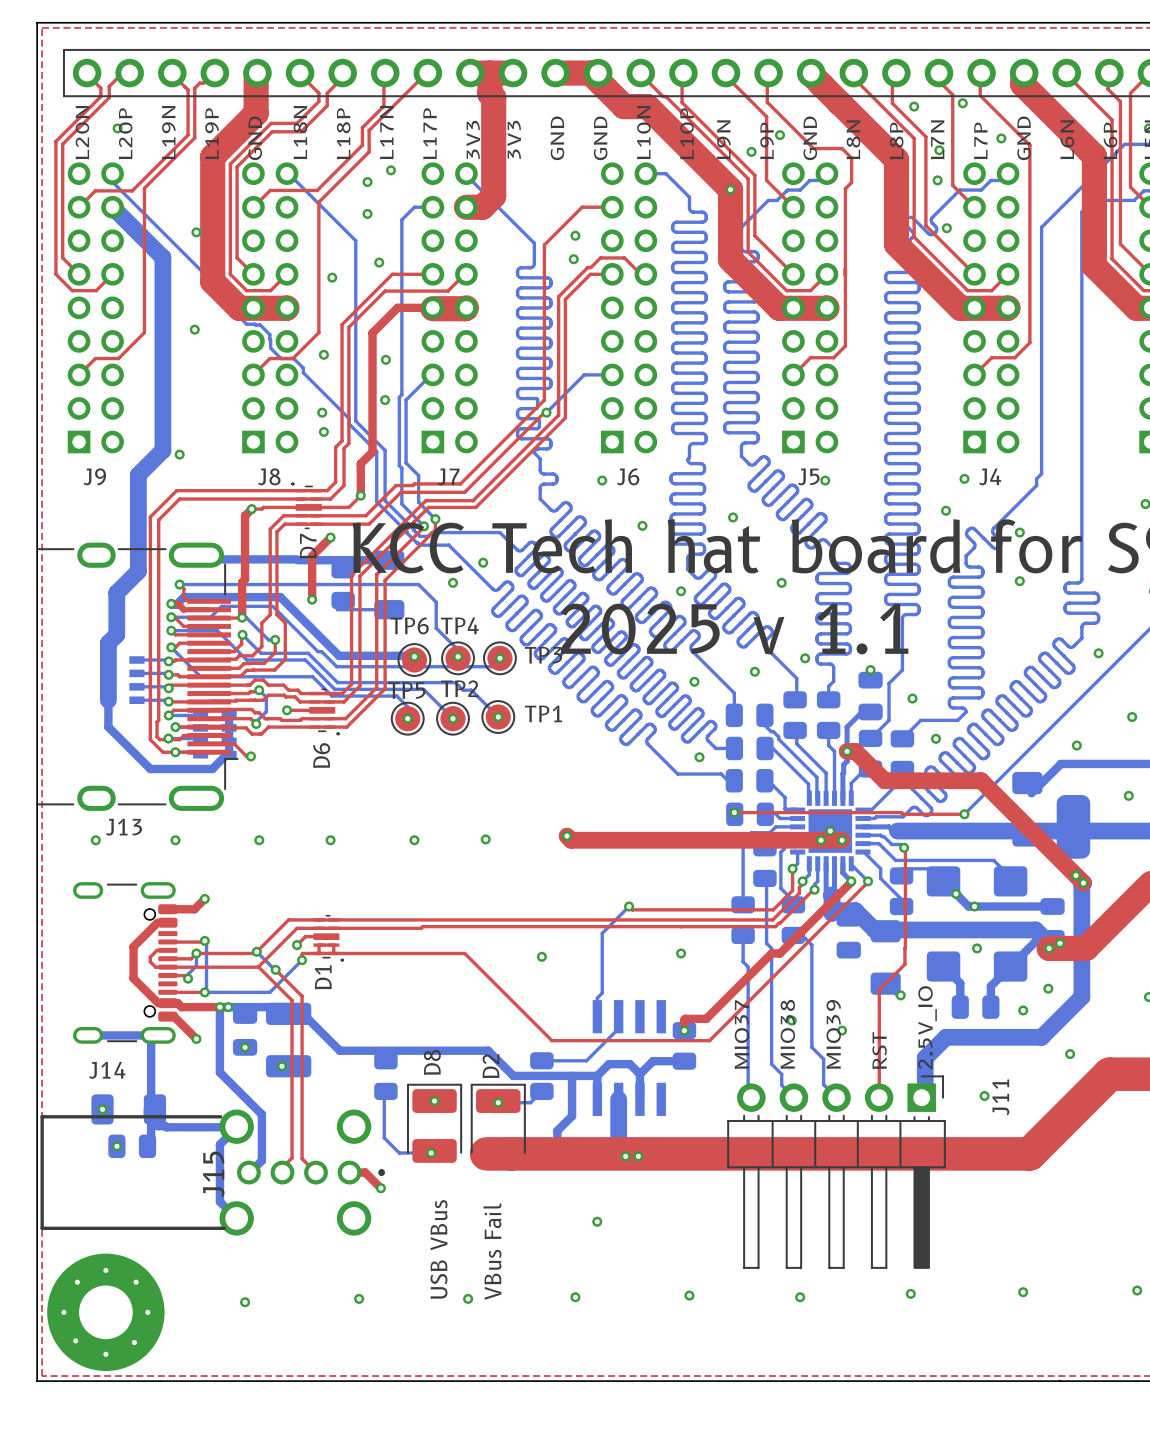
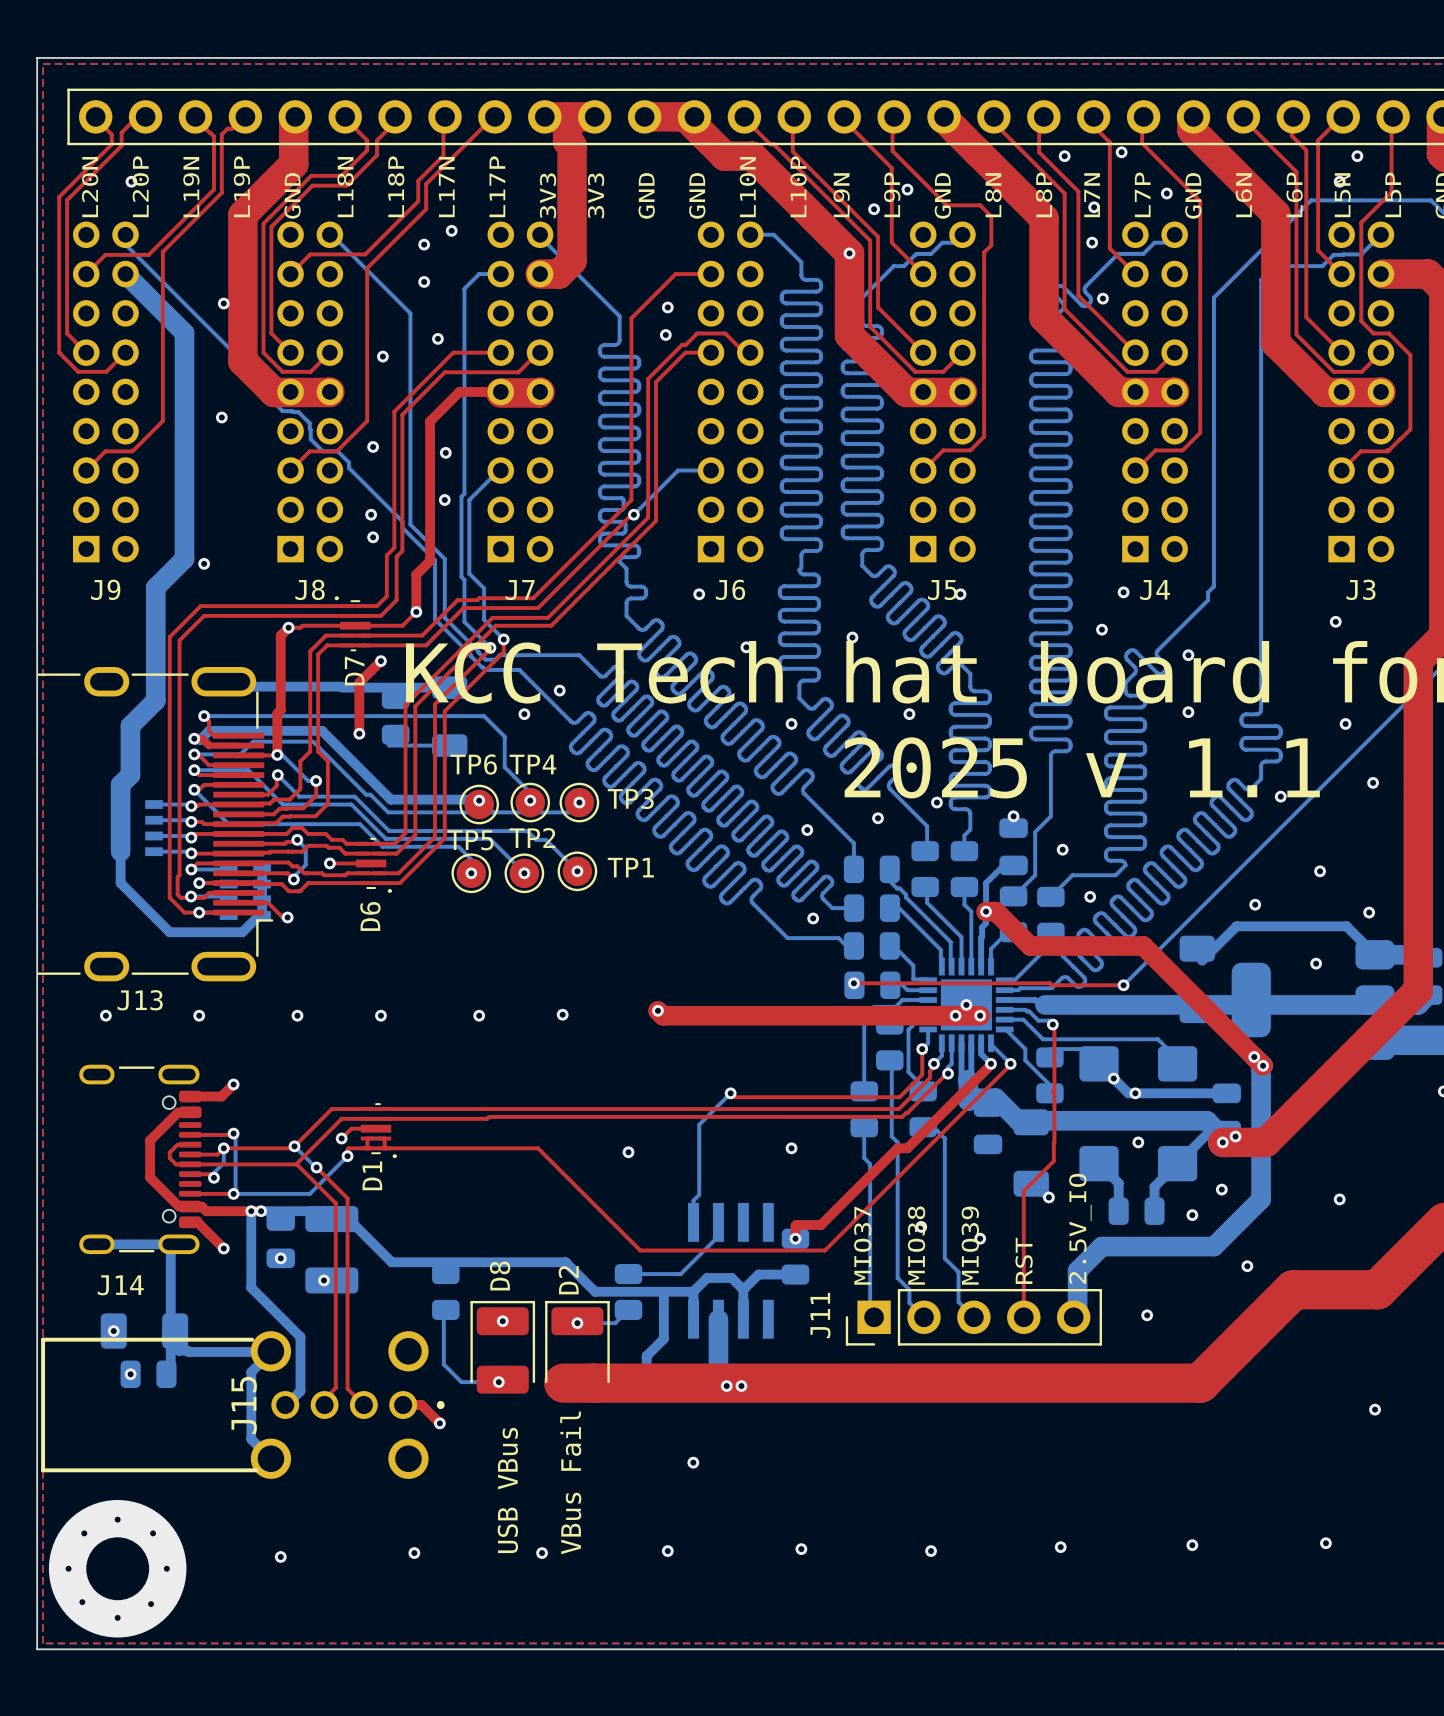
J11 footprint: [727, 1075, 946, 1269] -> [845, 1289, 1102, 1346]
J11 name position: J11 (1000, 1097) -> J11 (820, 1315)

